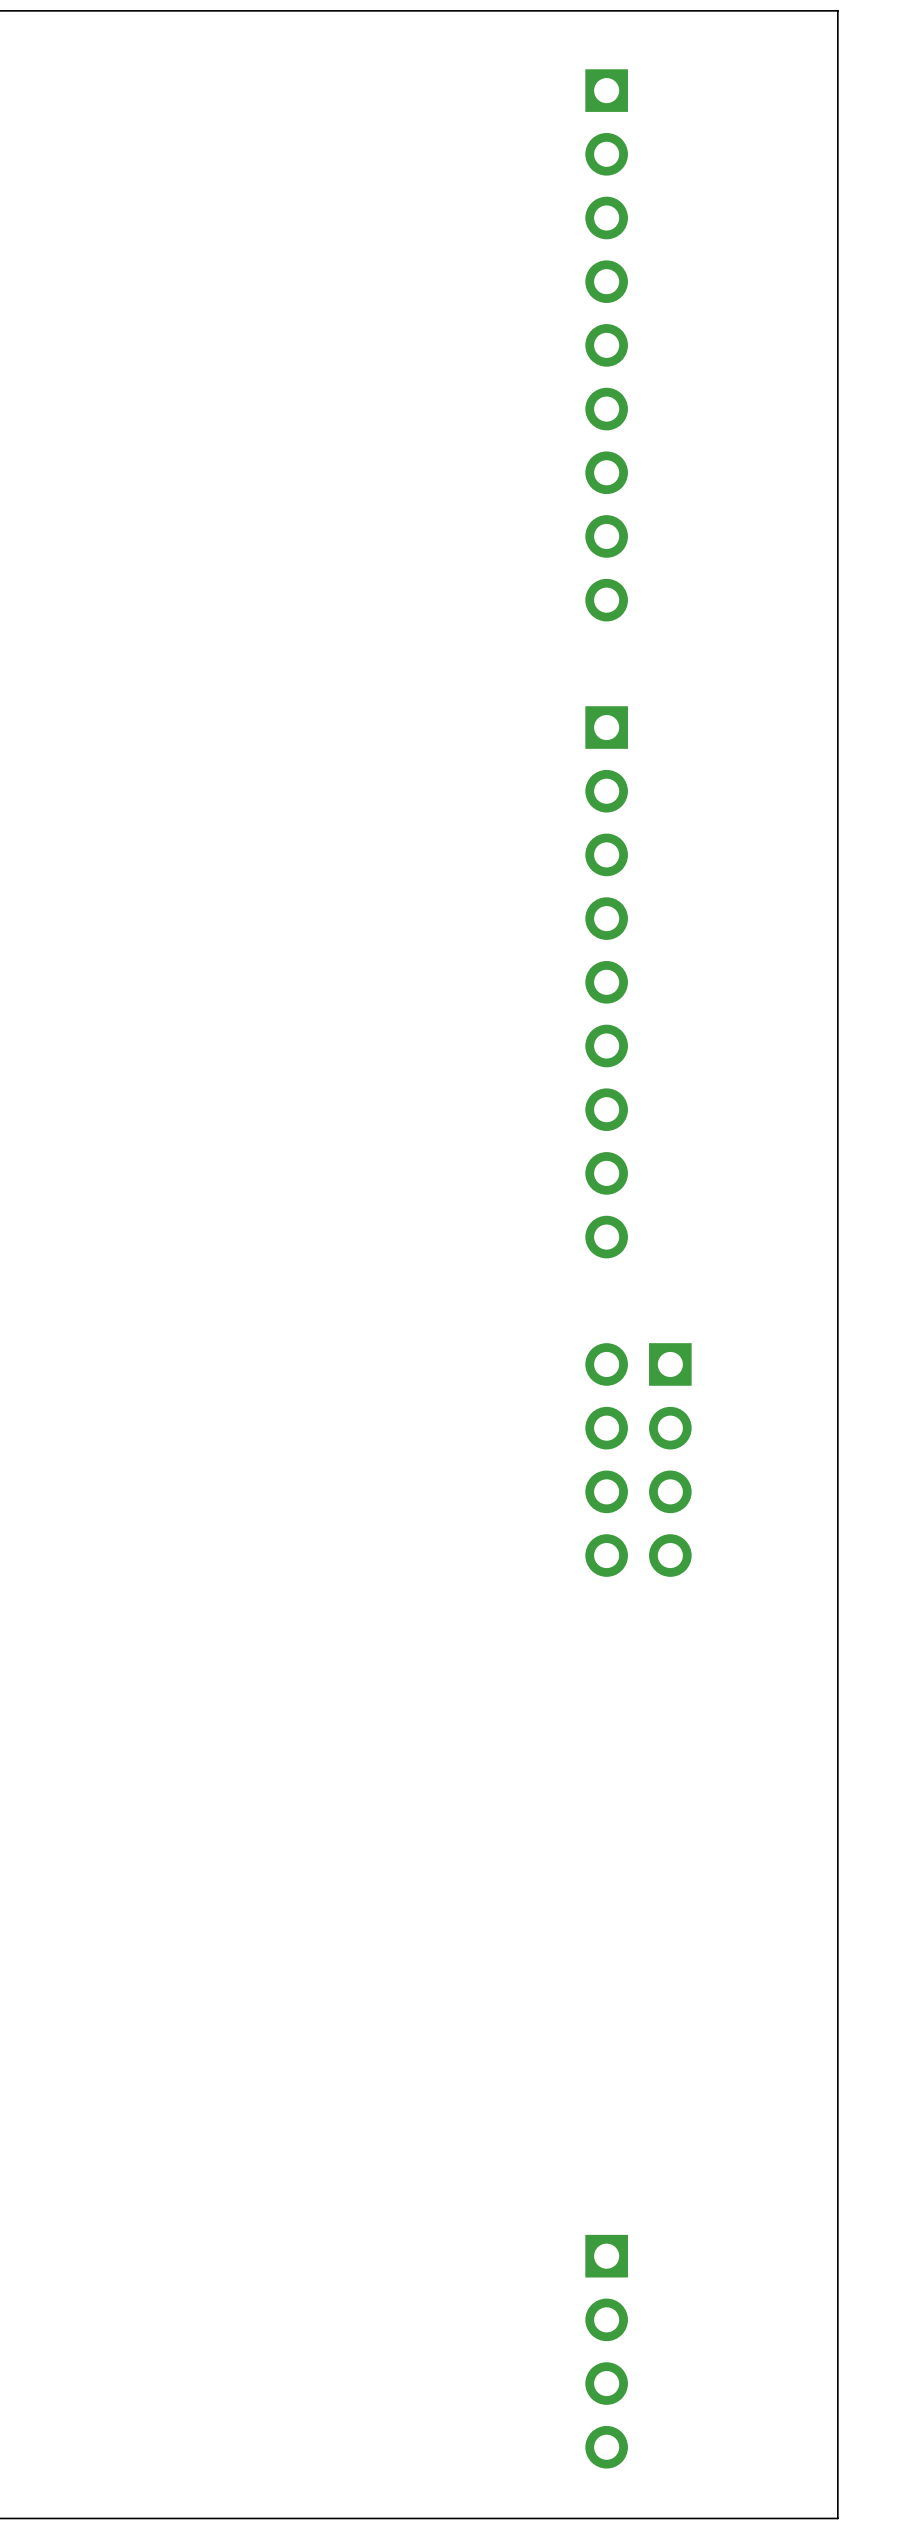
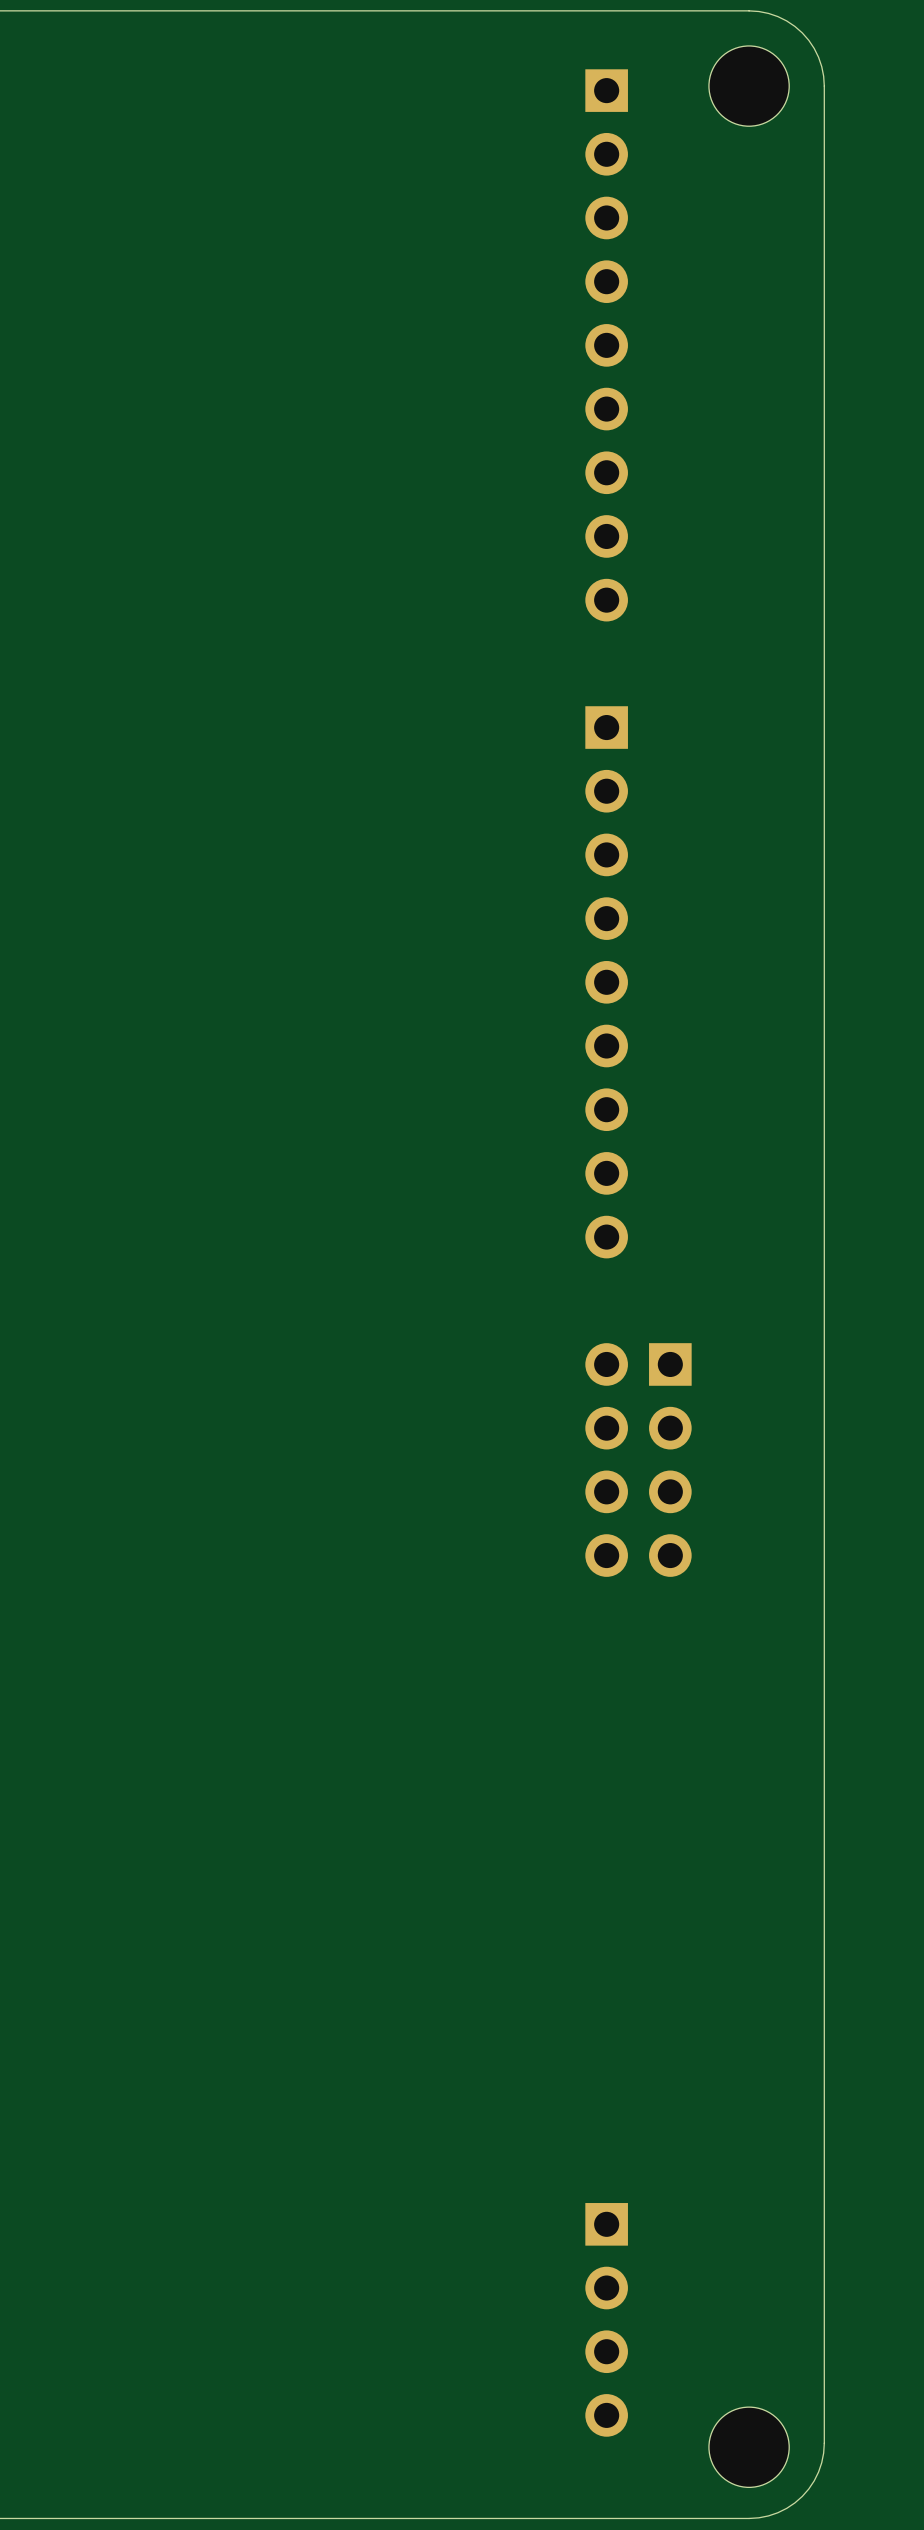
board edge: (749, 10) (837, 10) (837, 2518) (749, 2518) -> (749, 10) (777, 16) (802, 32) (818, 57) (824, 86) (824, 2443) (818, 2472) (802, 2496) (777, 2512) (749, 2518)
part: none -> (749, 86)
part position: (606, 2351) -> (606, 2319)
part: none -> (749, 2447)

